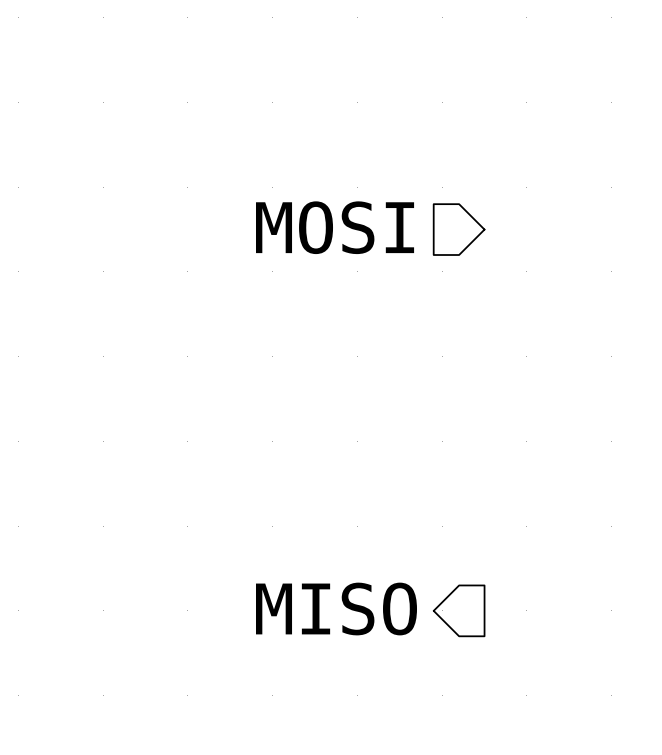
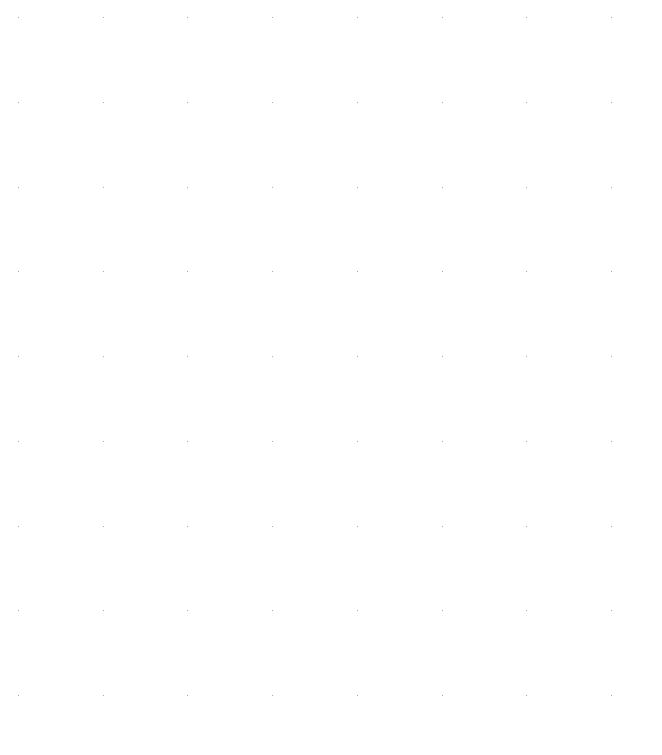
hierarchical label: MOSI (335, 227) -> none
hierarchical label: MISO (336, 609) -> none

